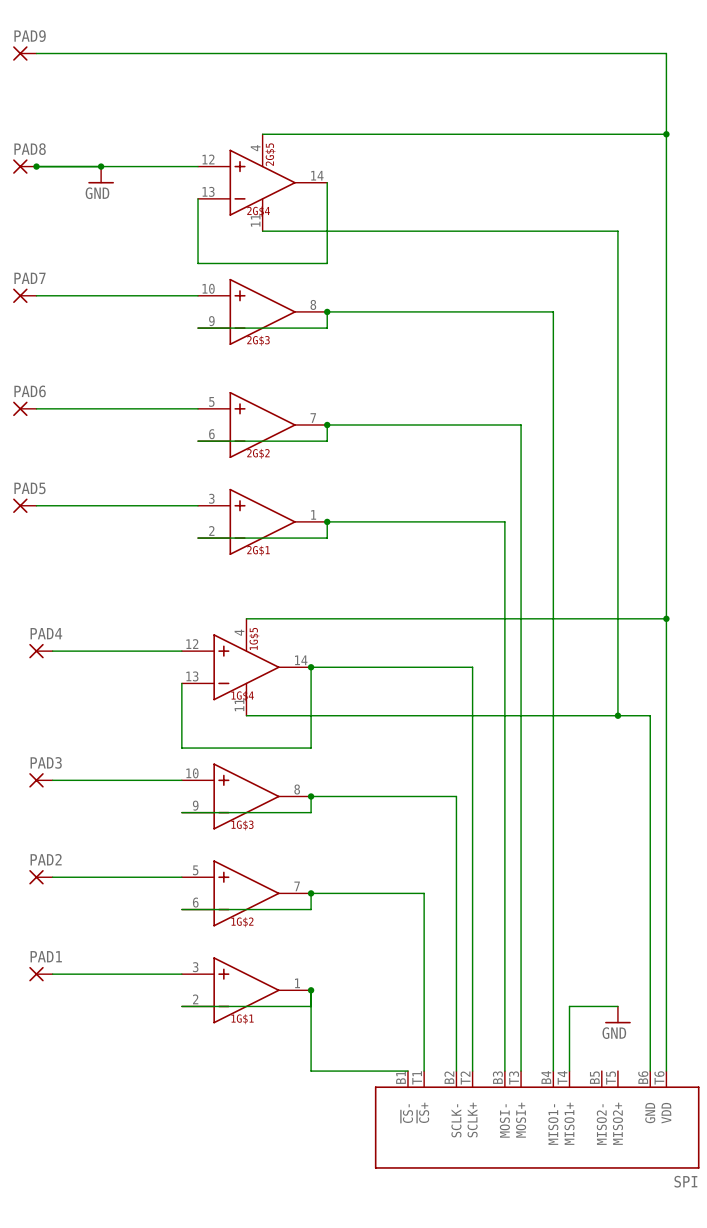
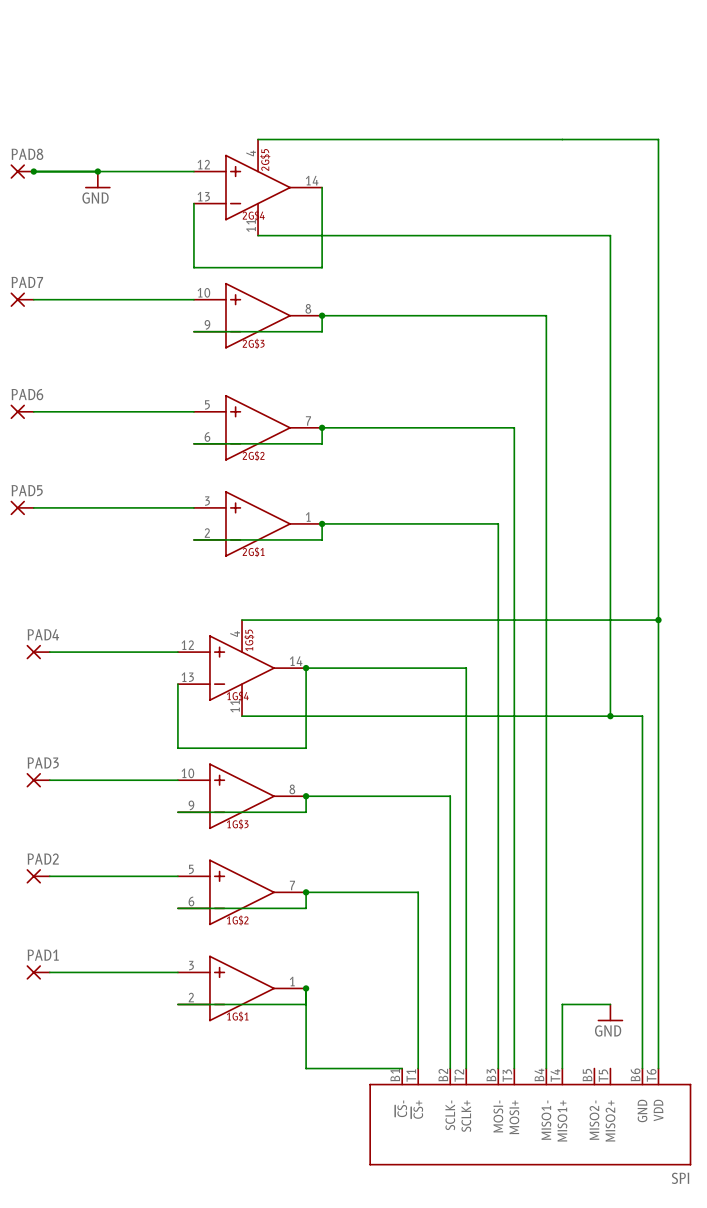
PAD9: (24, 53) -> none
wire: (36, 53) (666, 53) (666, 134) -> none
junction: (666, 134) -> none

